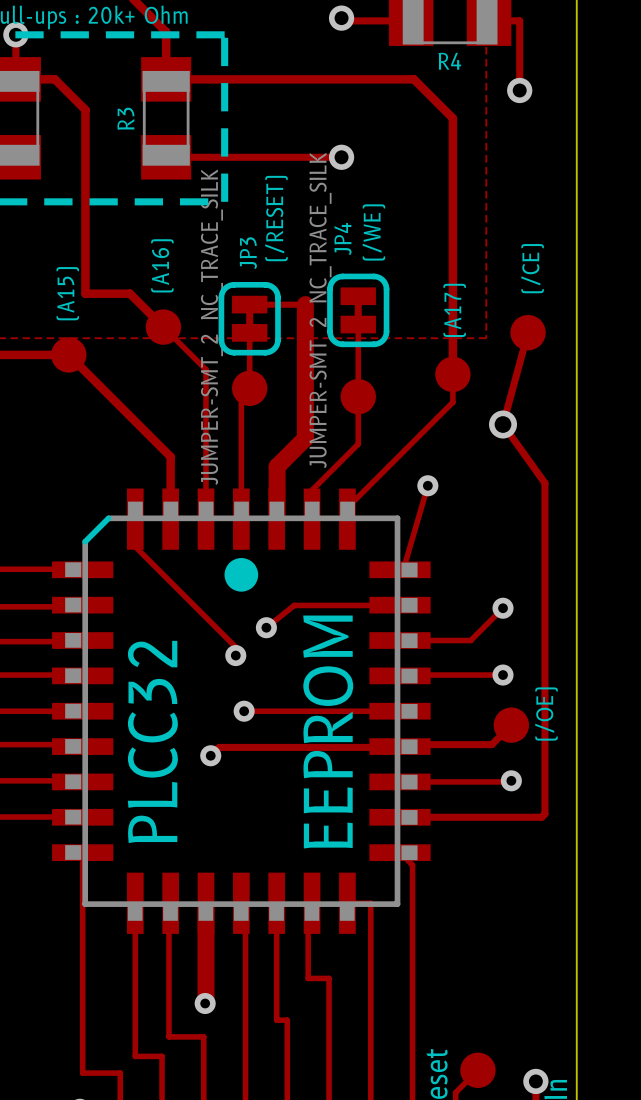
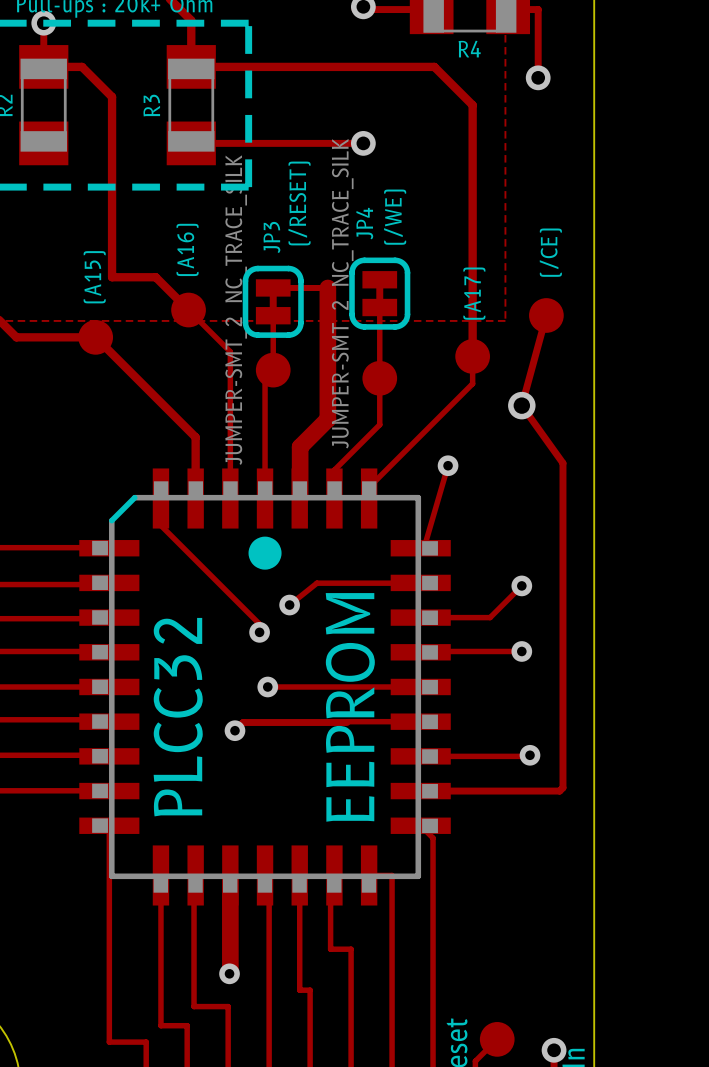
text: (/OE) (546, 714) -> none
track: (511, 725) (491, 744) (324, 747) -> (420, 721) (346, 722)
part: (511, 725) -> none

